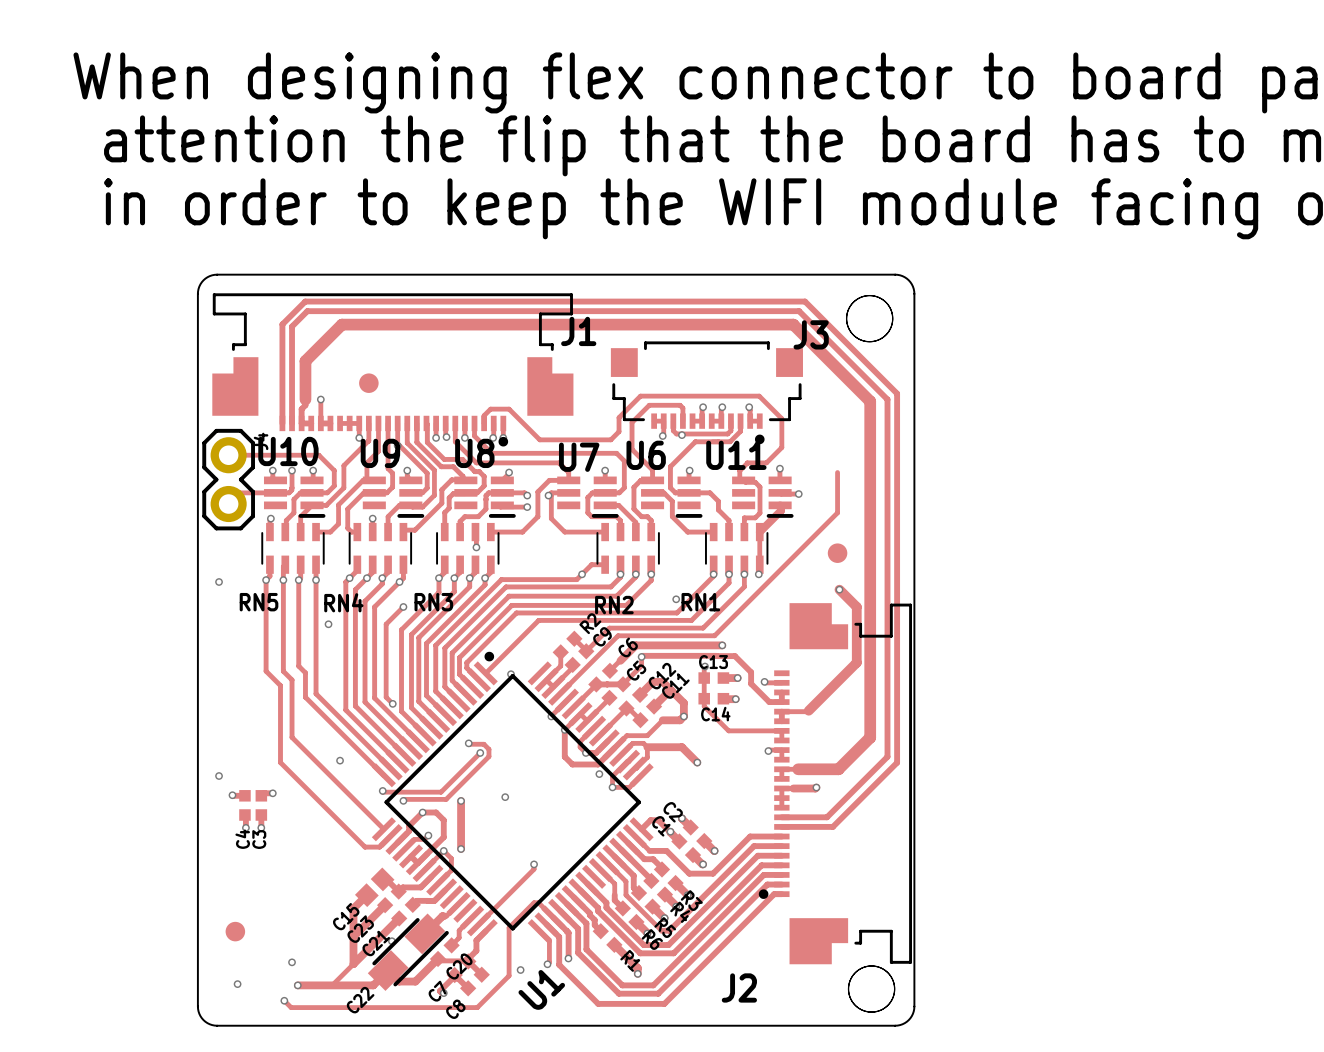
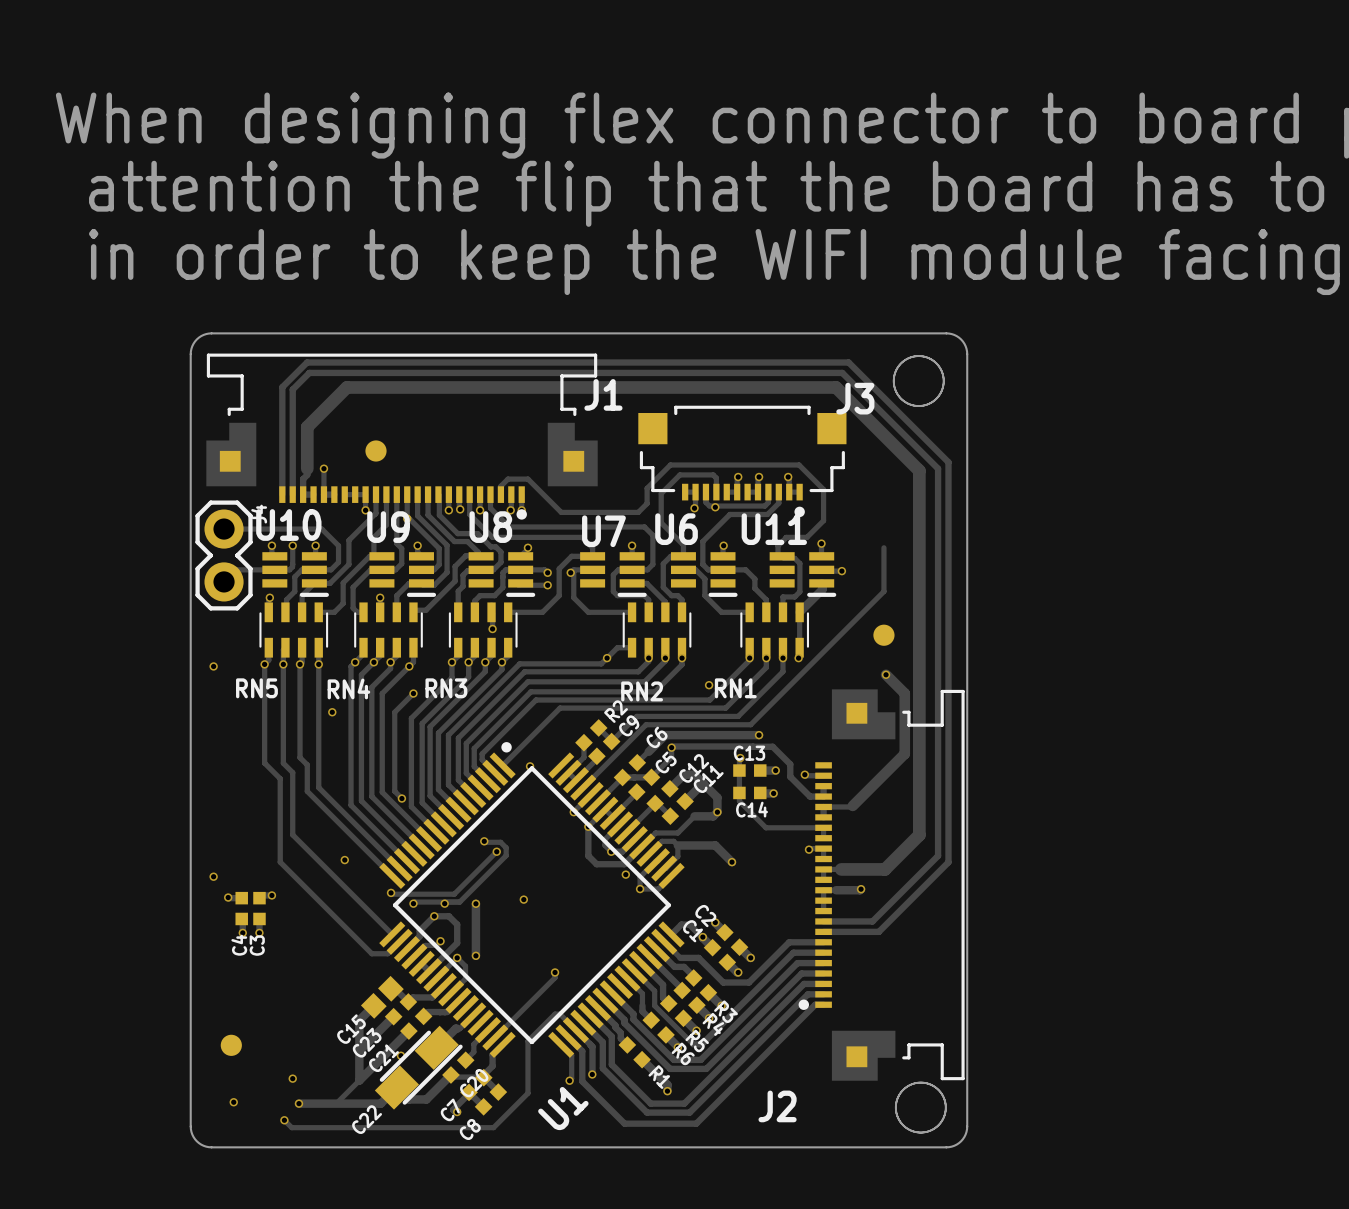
via: none -> (444, 903)
via: (520, 970) -> none

